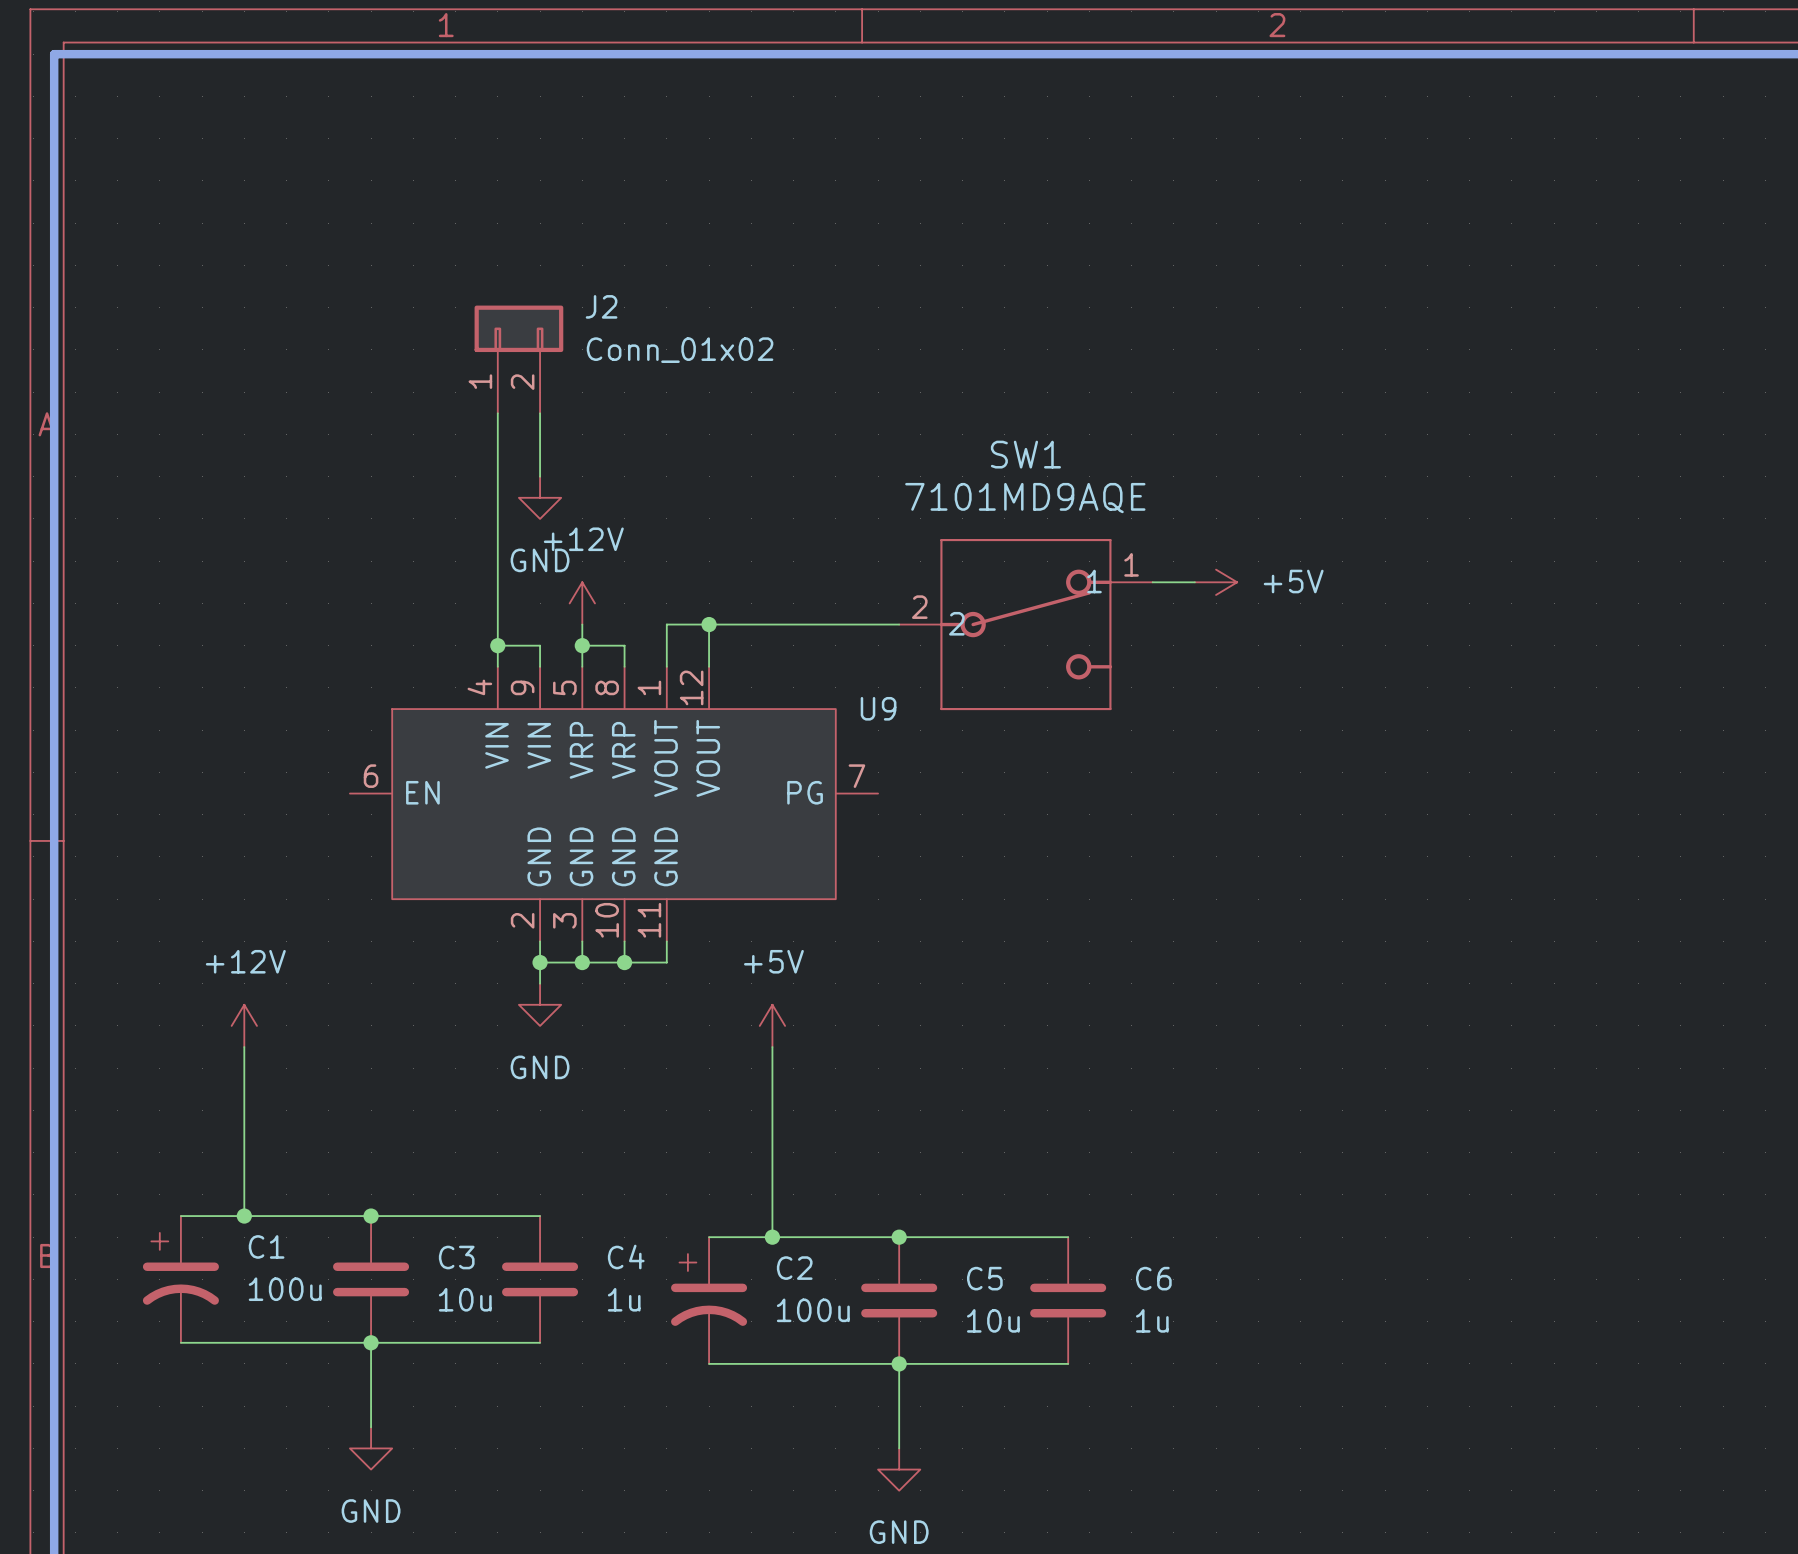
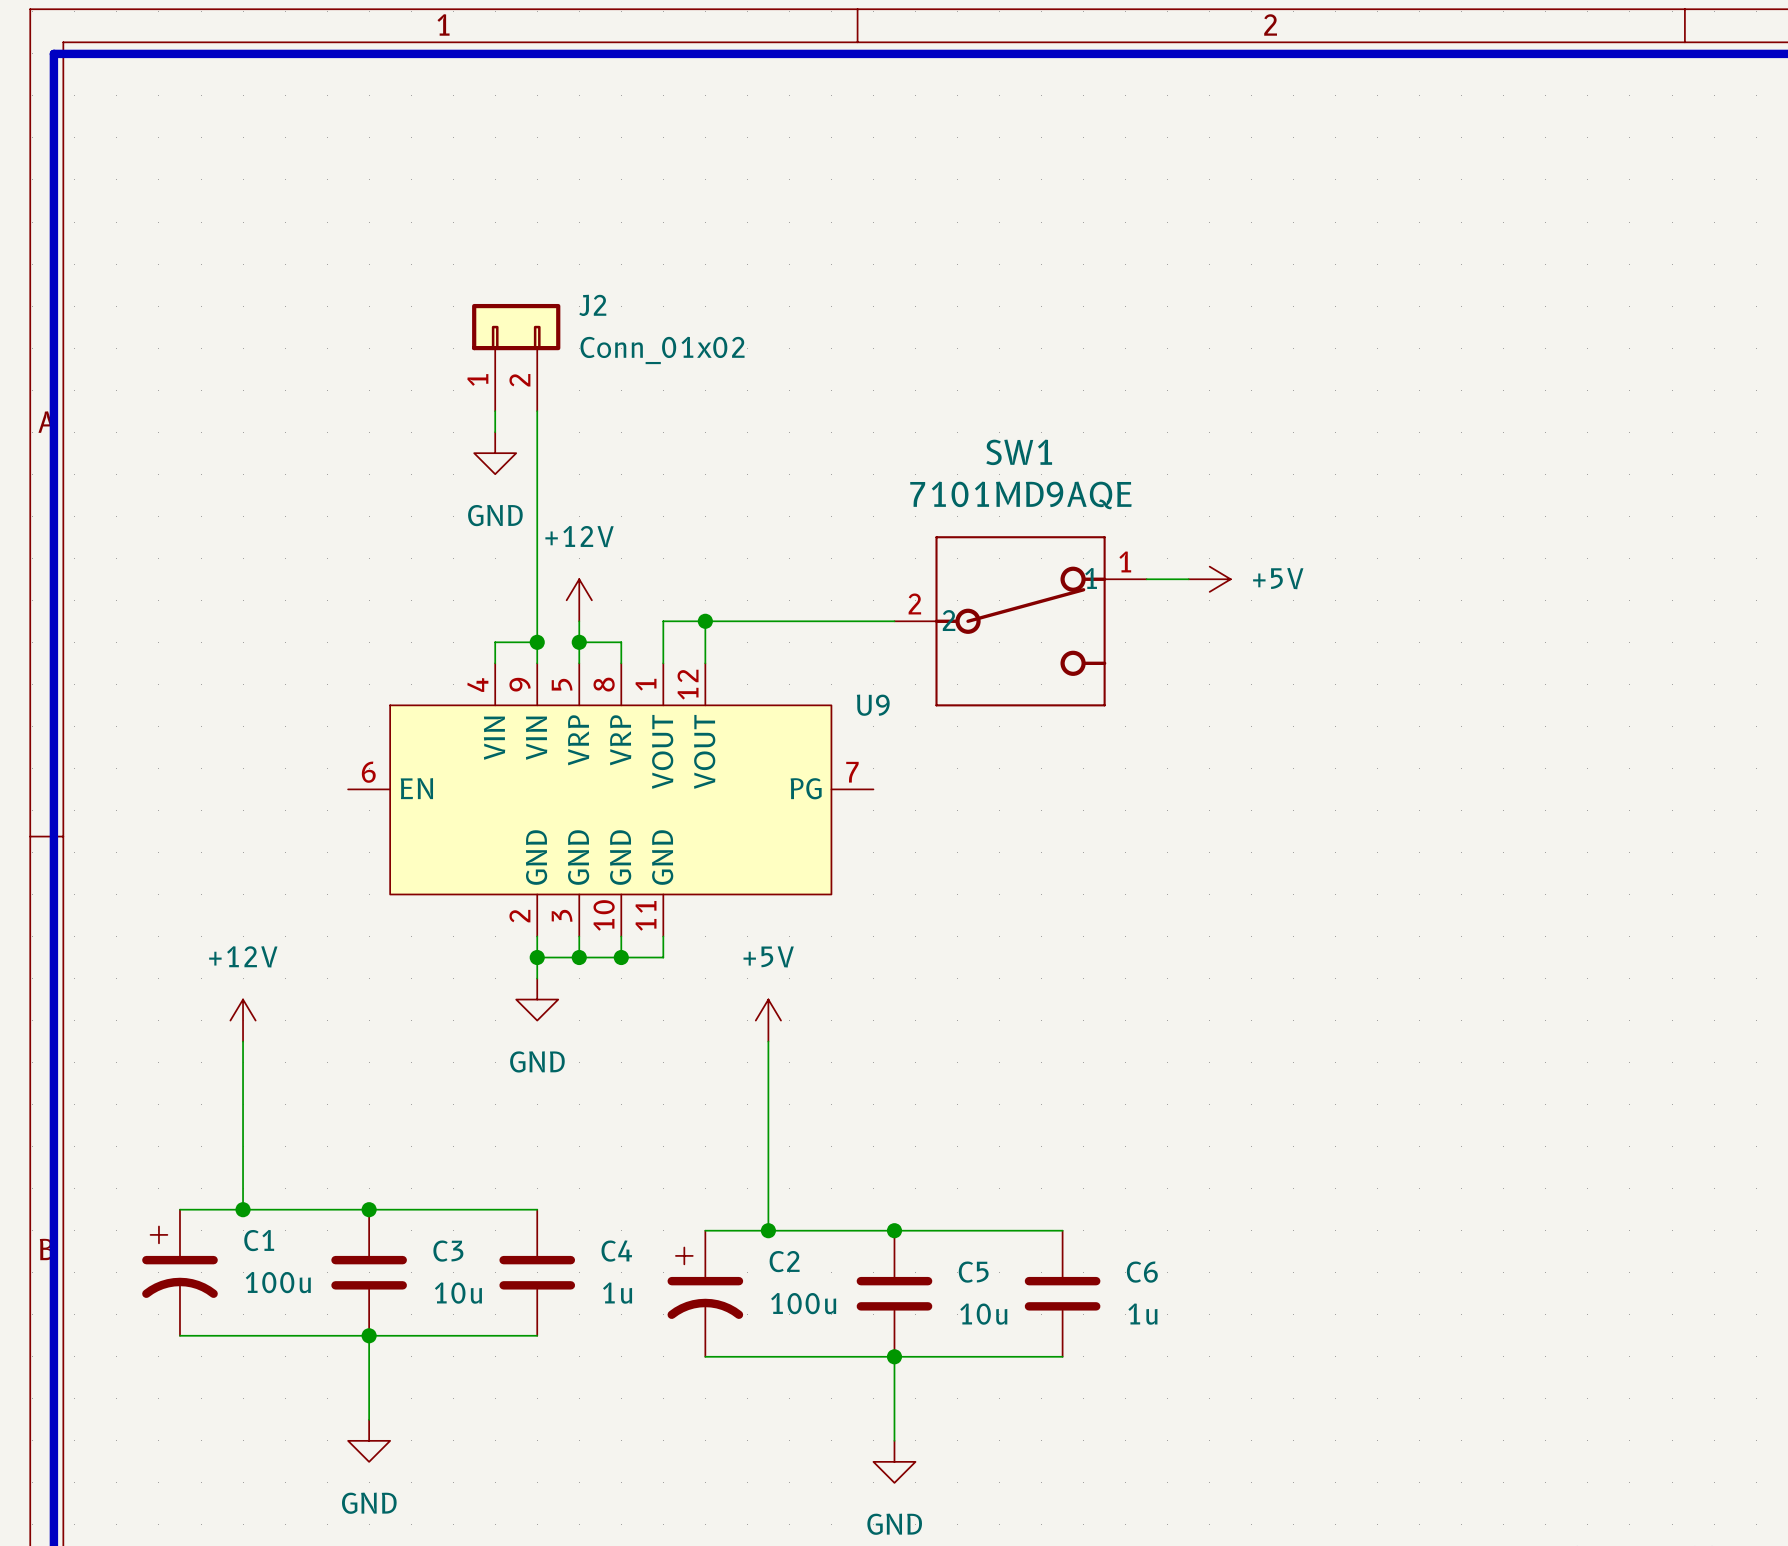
wire: (497, 434) (497, 645) -> none
wire: none -> (537, 474) (537, 642)
power symbol position: GND (540, 497) -> GND (495, 453)
junction position: (497, 645) -> (537, 642)

